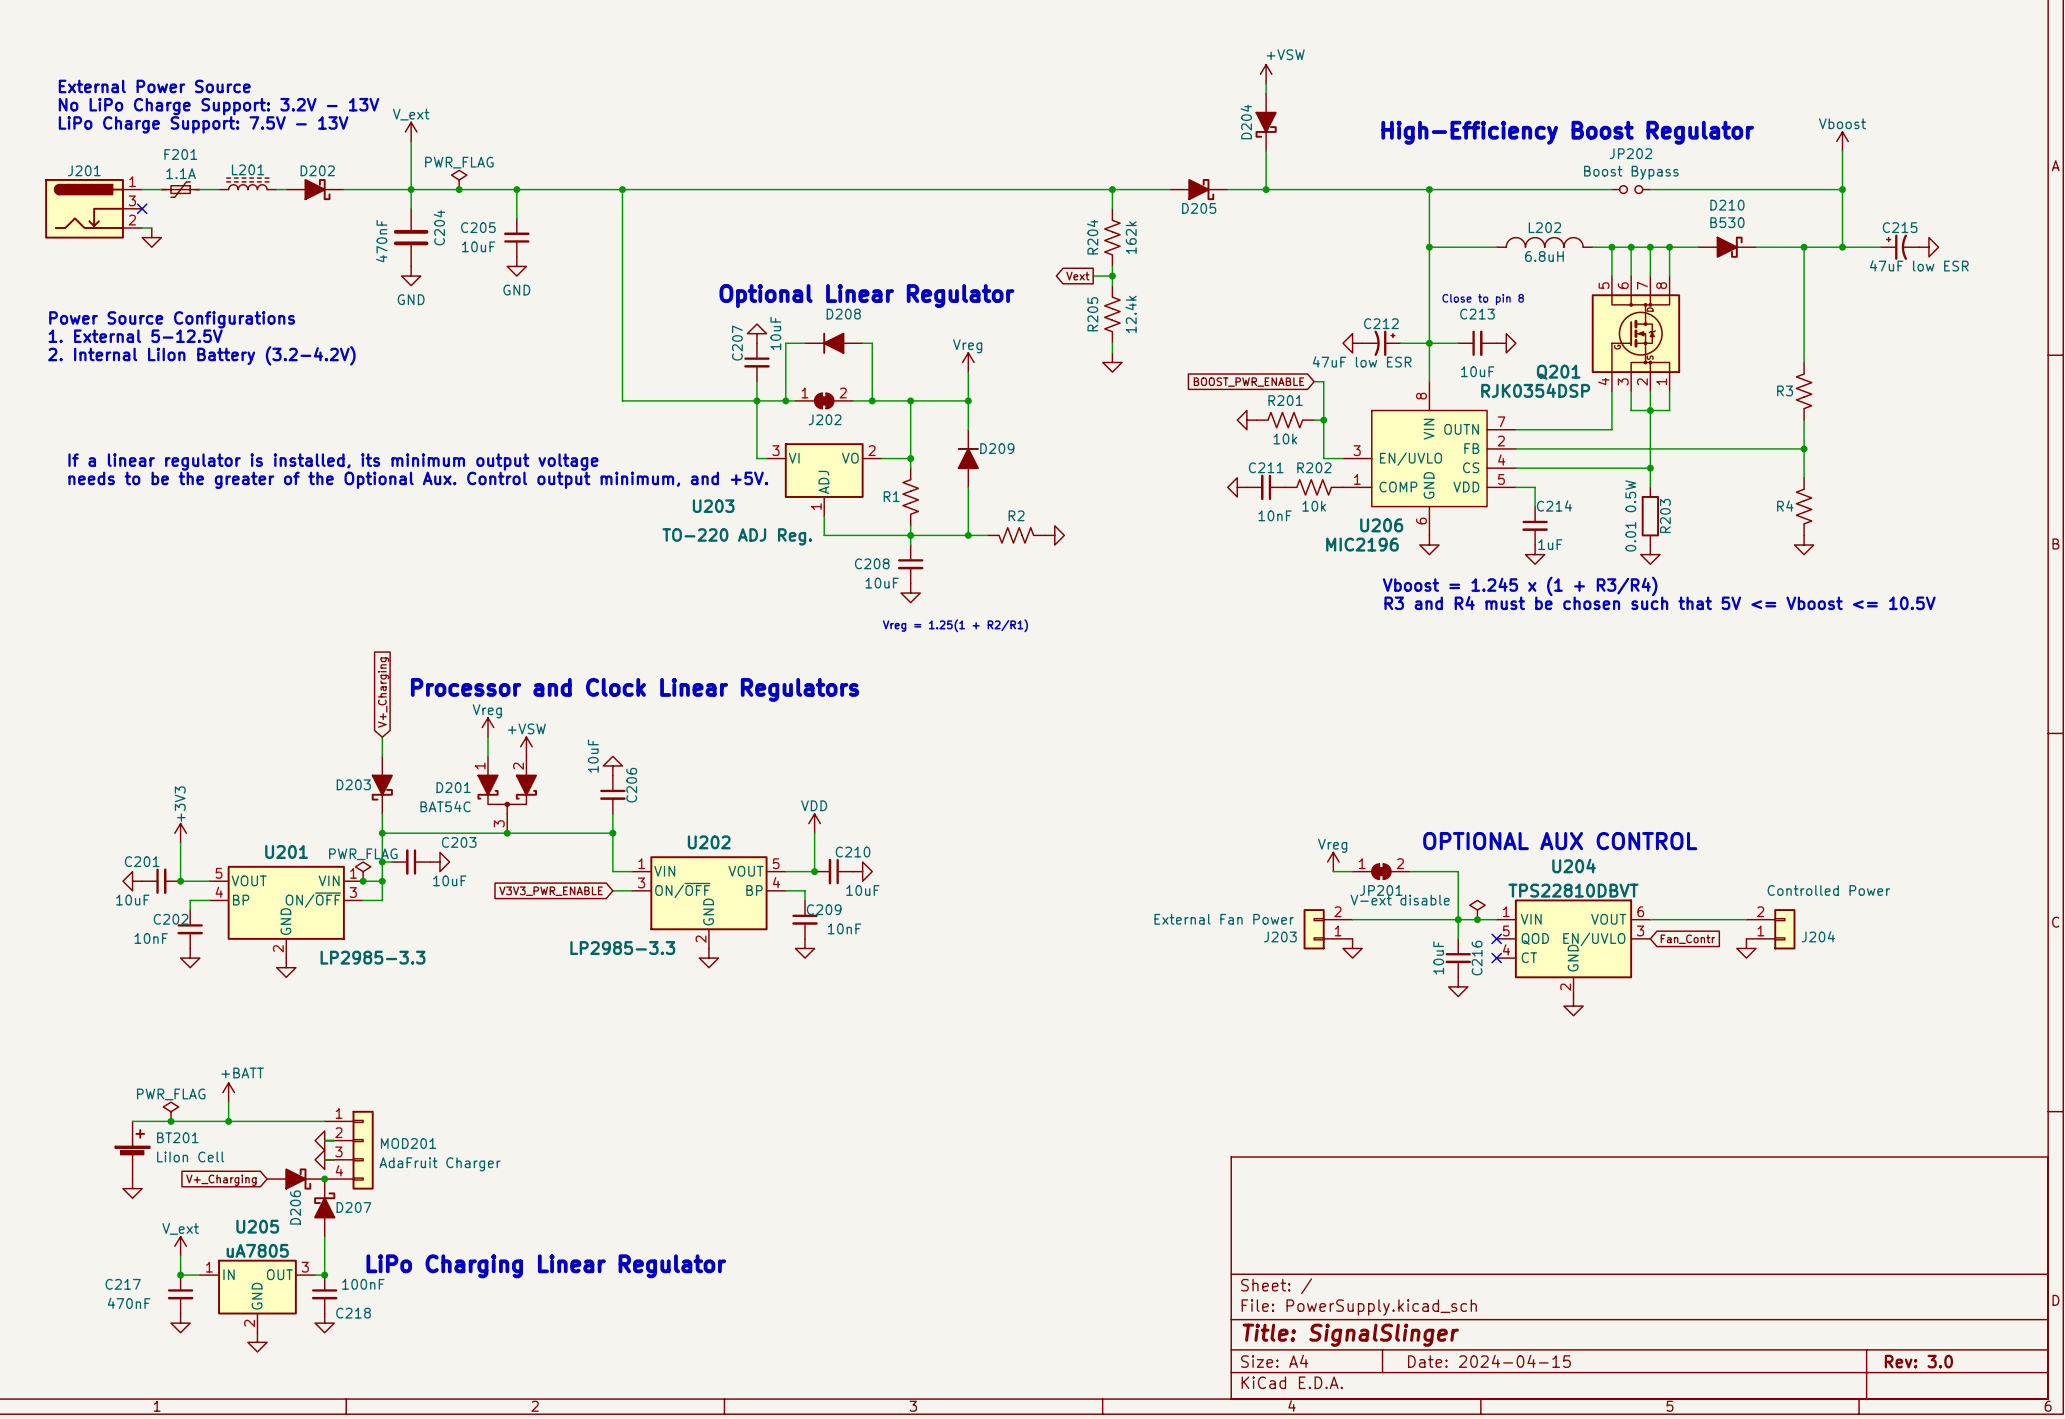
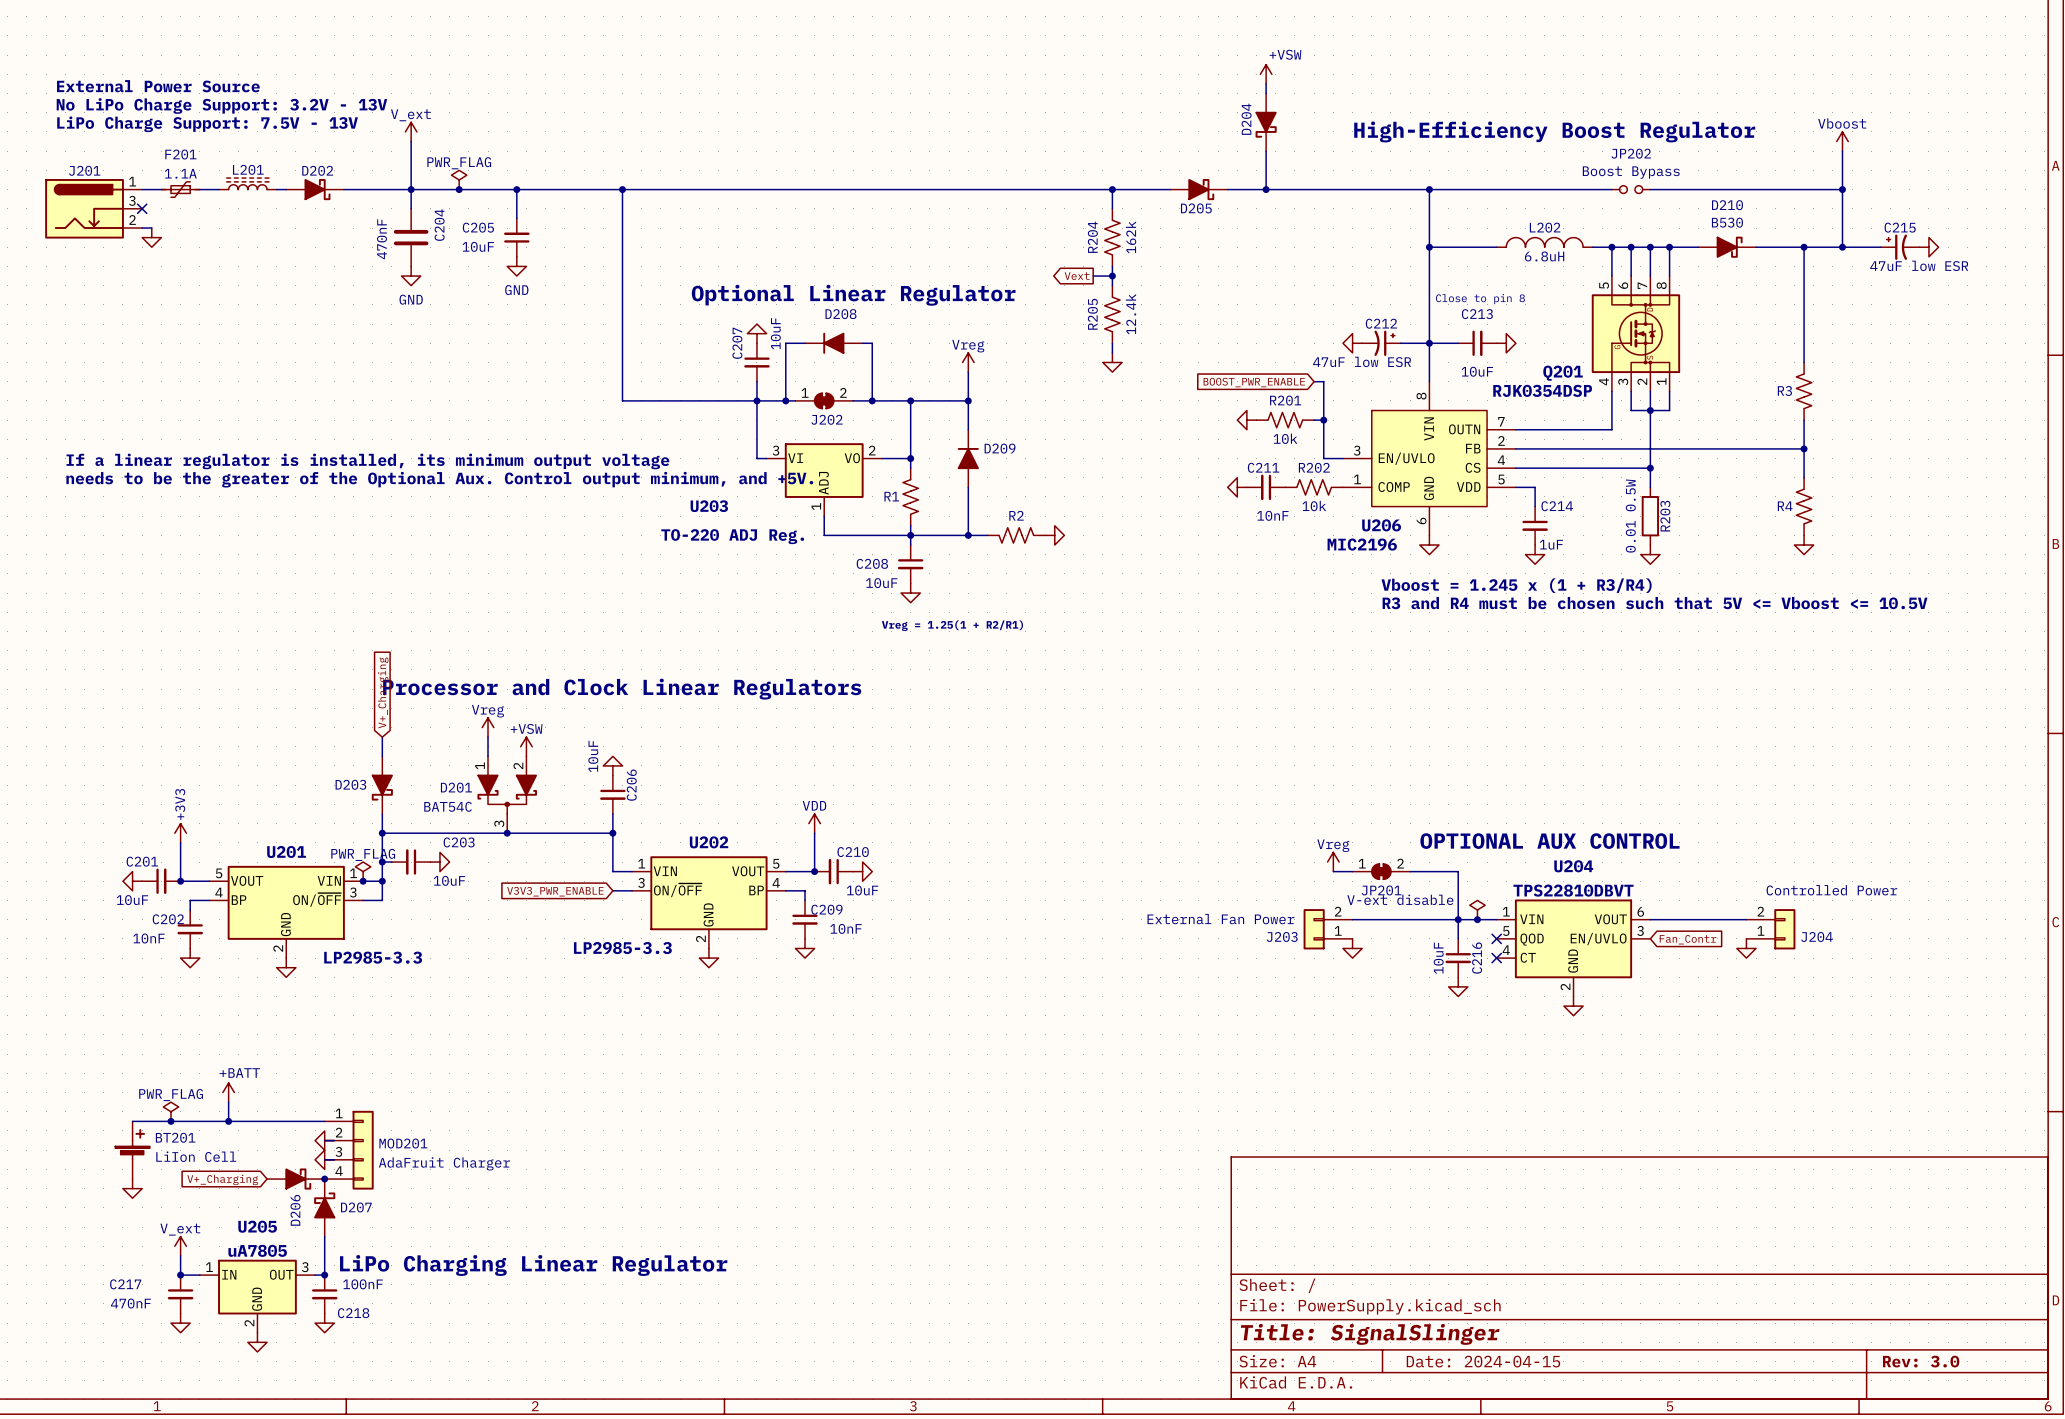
text: Power Source Configurations (172, 319) -> none
text: 1. External 5-12.5V (135, 336) -> none
text: 2. Internal LiIon Battery (3.2-4.2V) (201, 355) -> none

